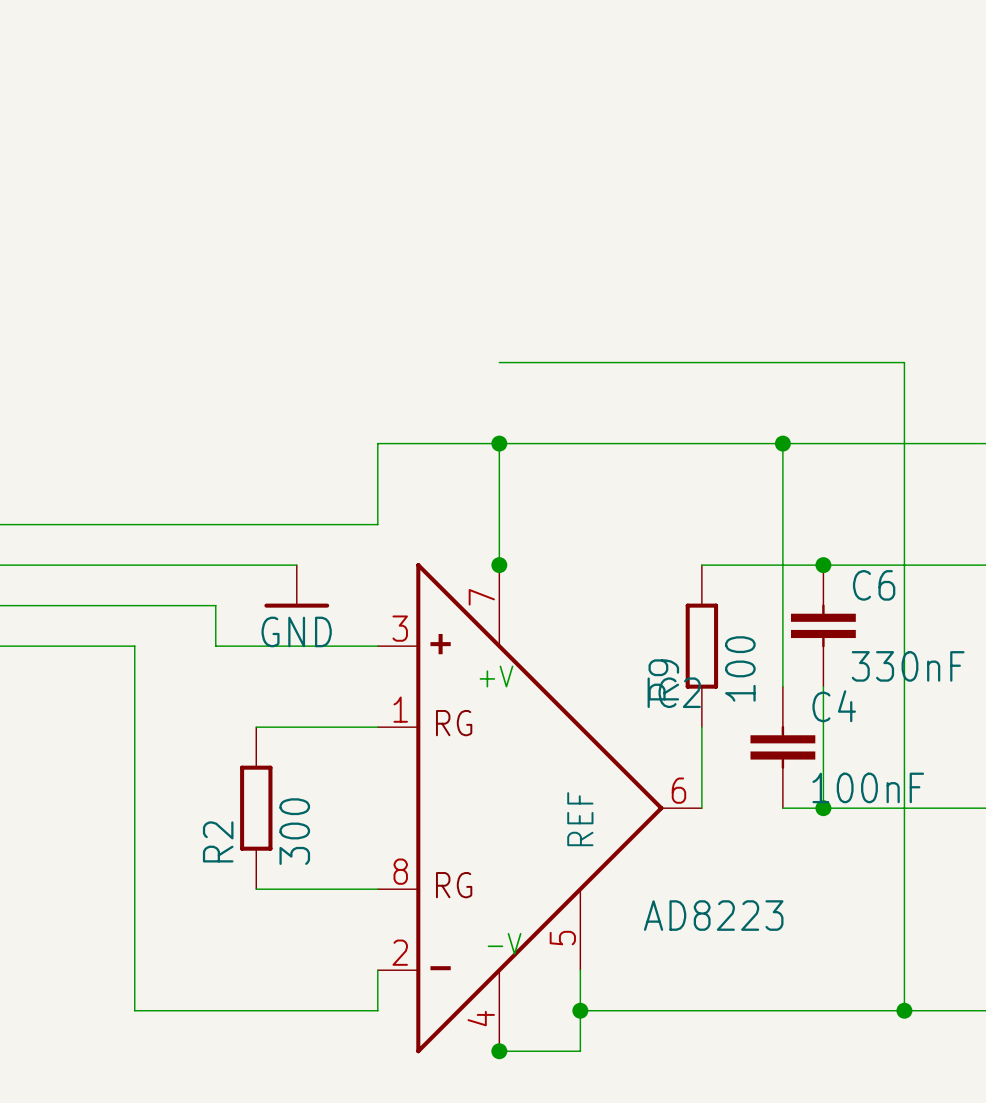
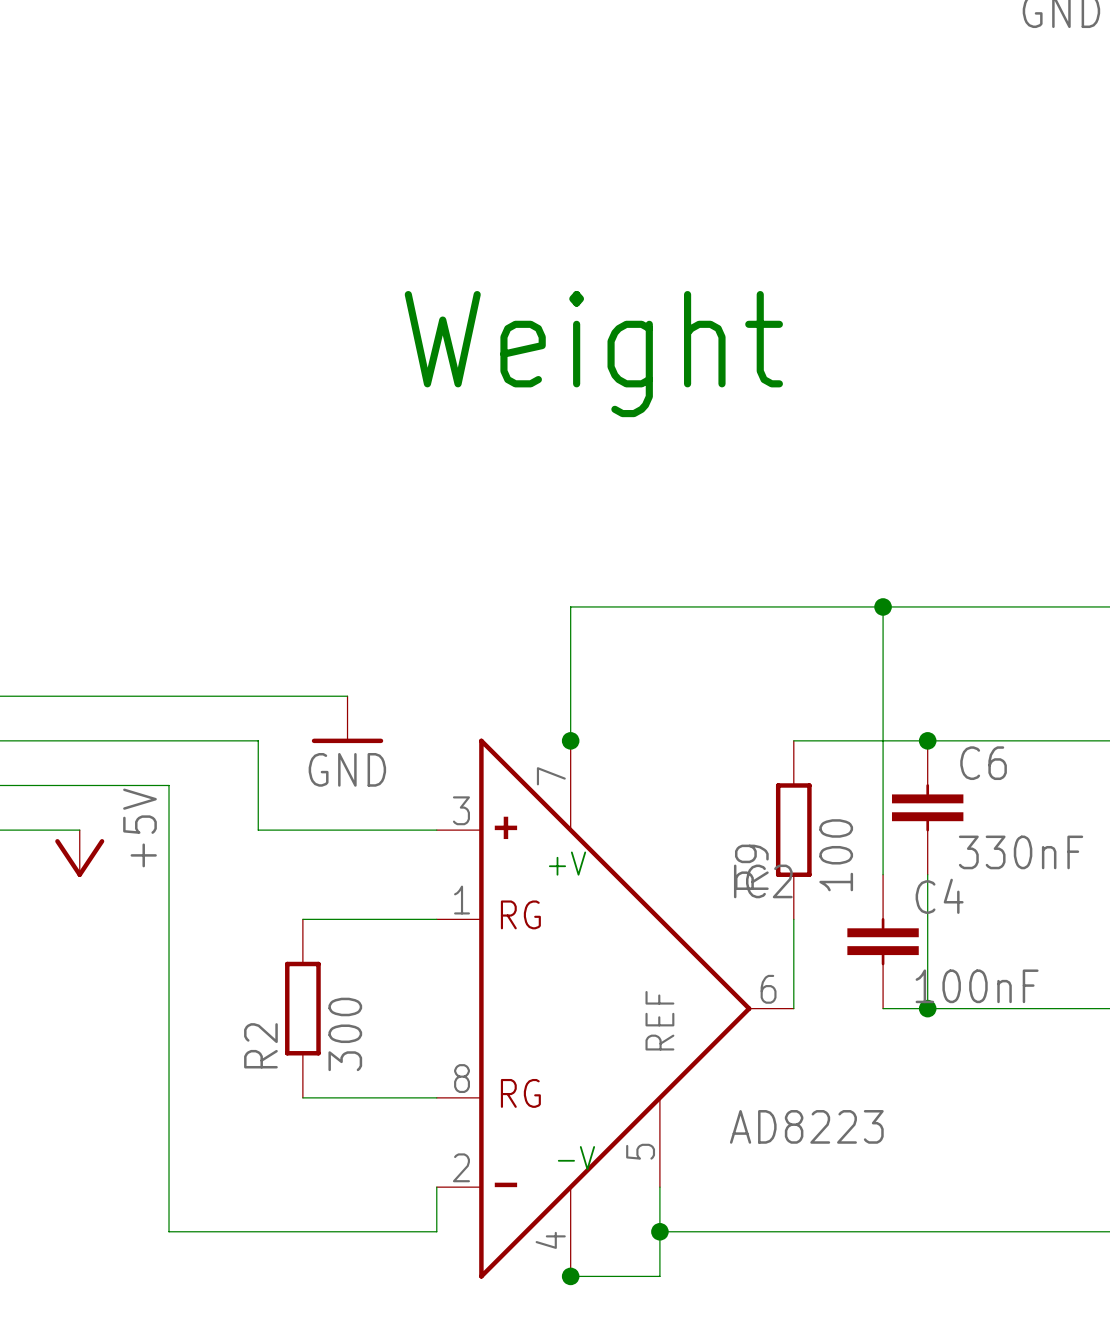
text: none -> Weight (593, 354)
wire: (499, 362) (904, 362) (904, 1010) -> none
wire: (499, 443) (377, 443) (377, 524) (296, 524) -> none
junction: (499, 443) -> none
wire: (215, 565) (296, 565) -> (258, 740) (258, 785)
power symbol position: GND (296, 586) -> GND (347, 719)
wire: (134, 605) (215, 605) -> (169, 785) (169, 830)
wire: (53, 646) (134, 646) -> none
power symbol: none -> +5V (79, 853)
junction: (904, 1010) -> none

